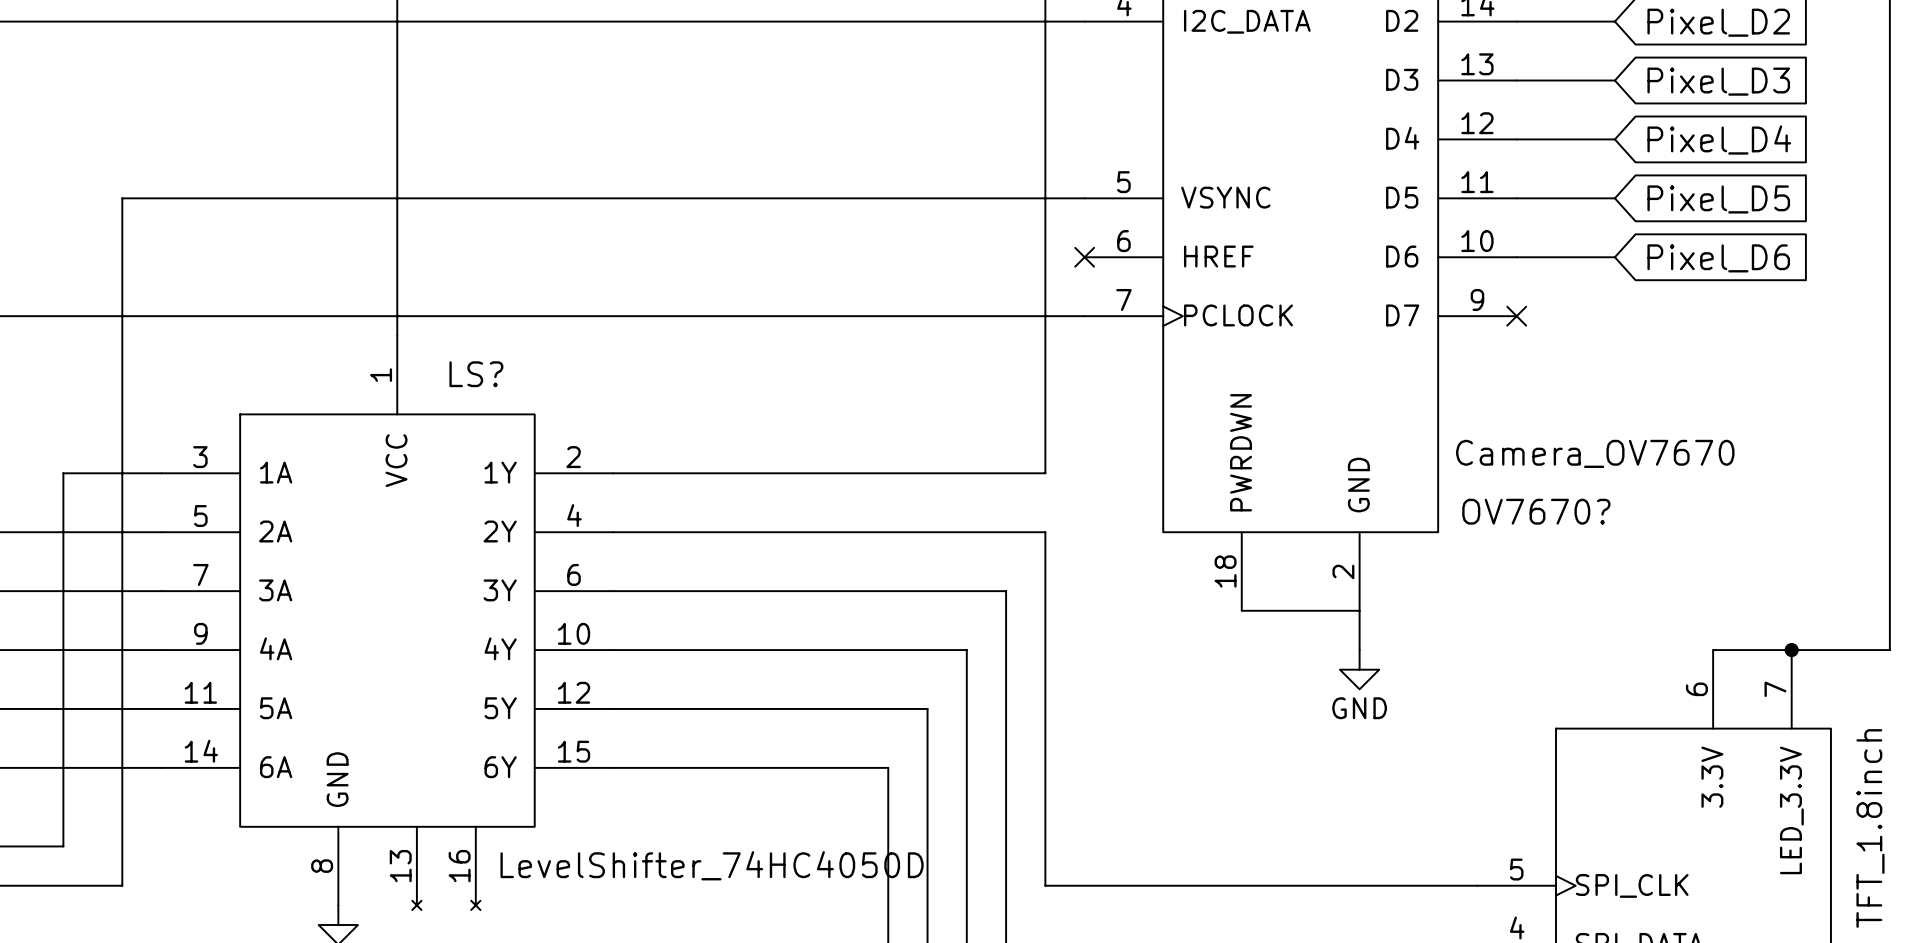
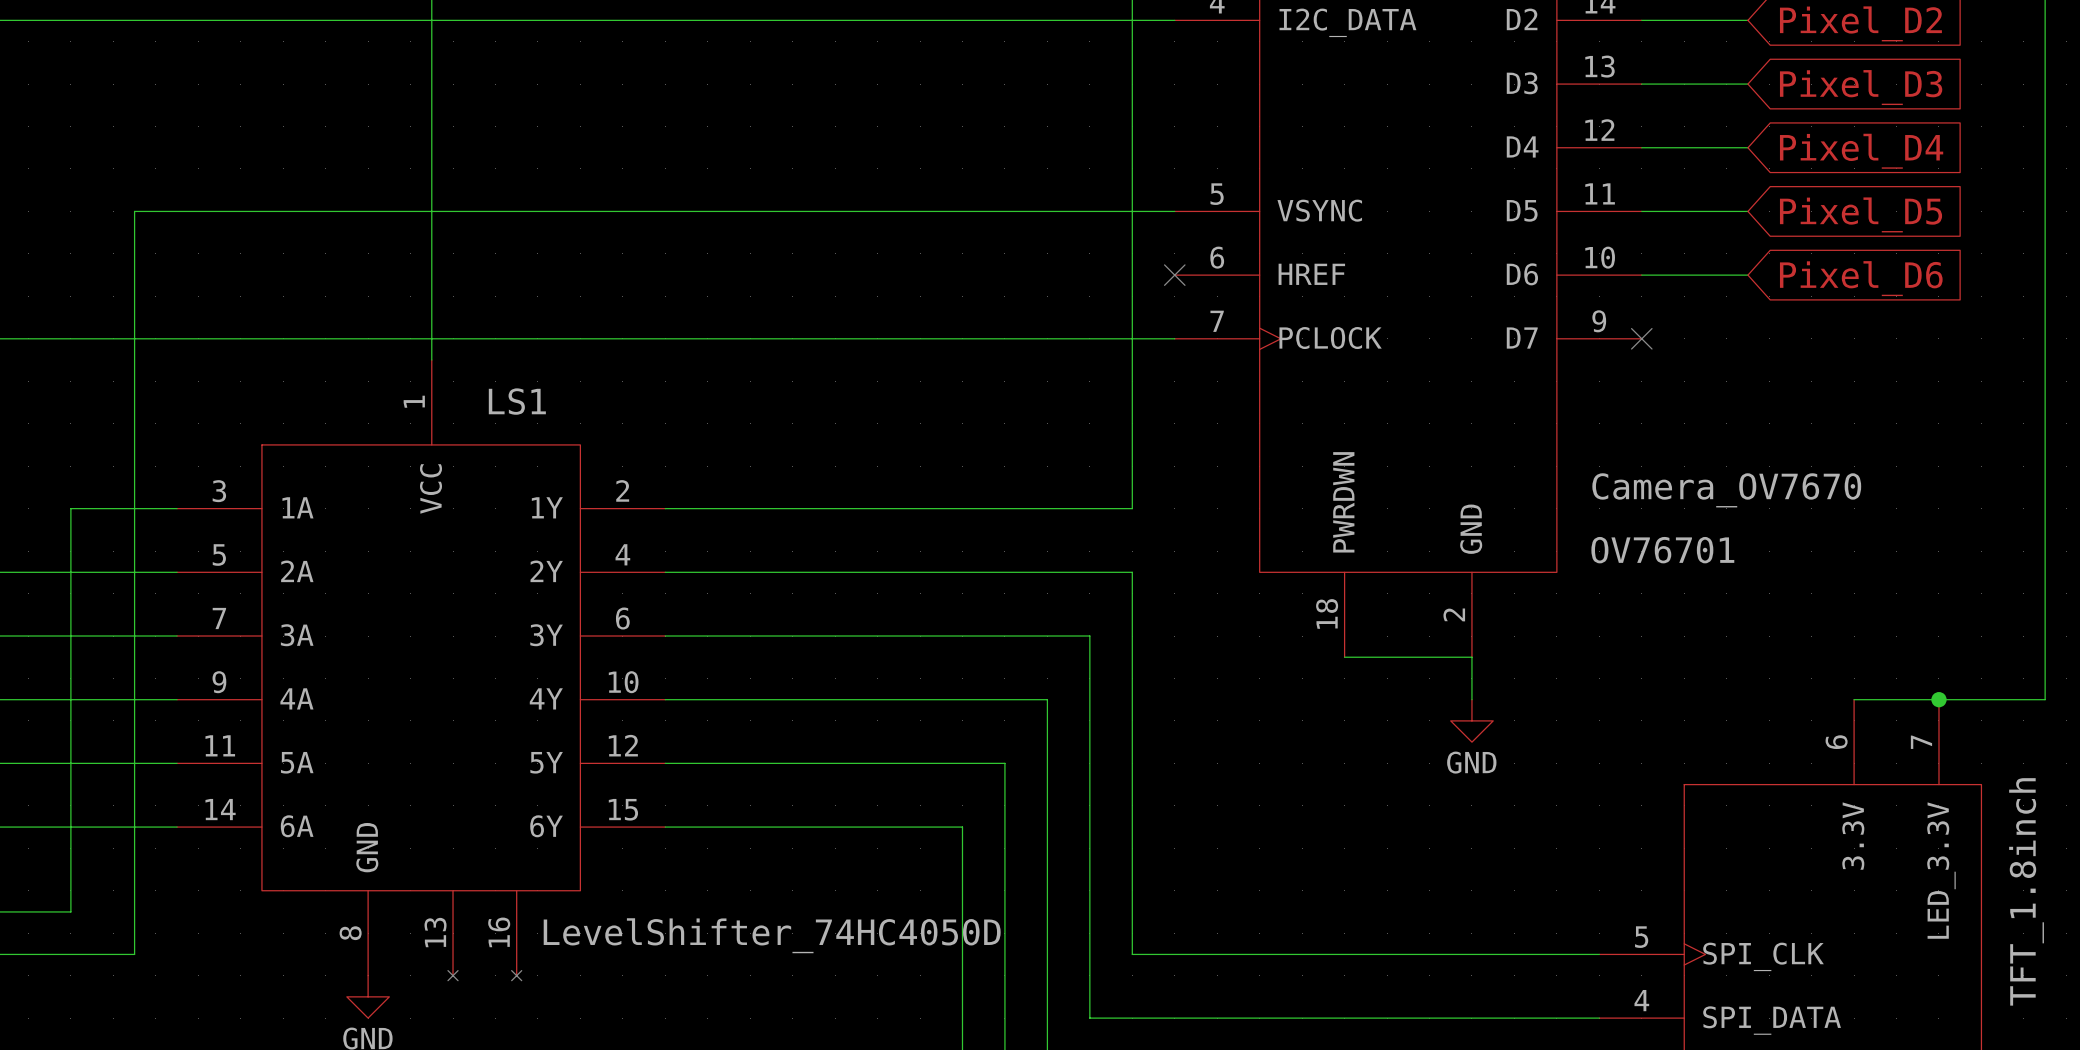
LS? name: LS? (476, 374) -> LS1 (517, 401)
OV7670? name: OV7670? (1536, 511) -> OV76701 (1662, 550)

